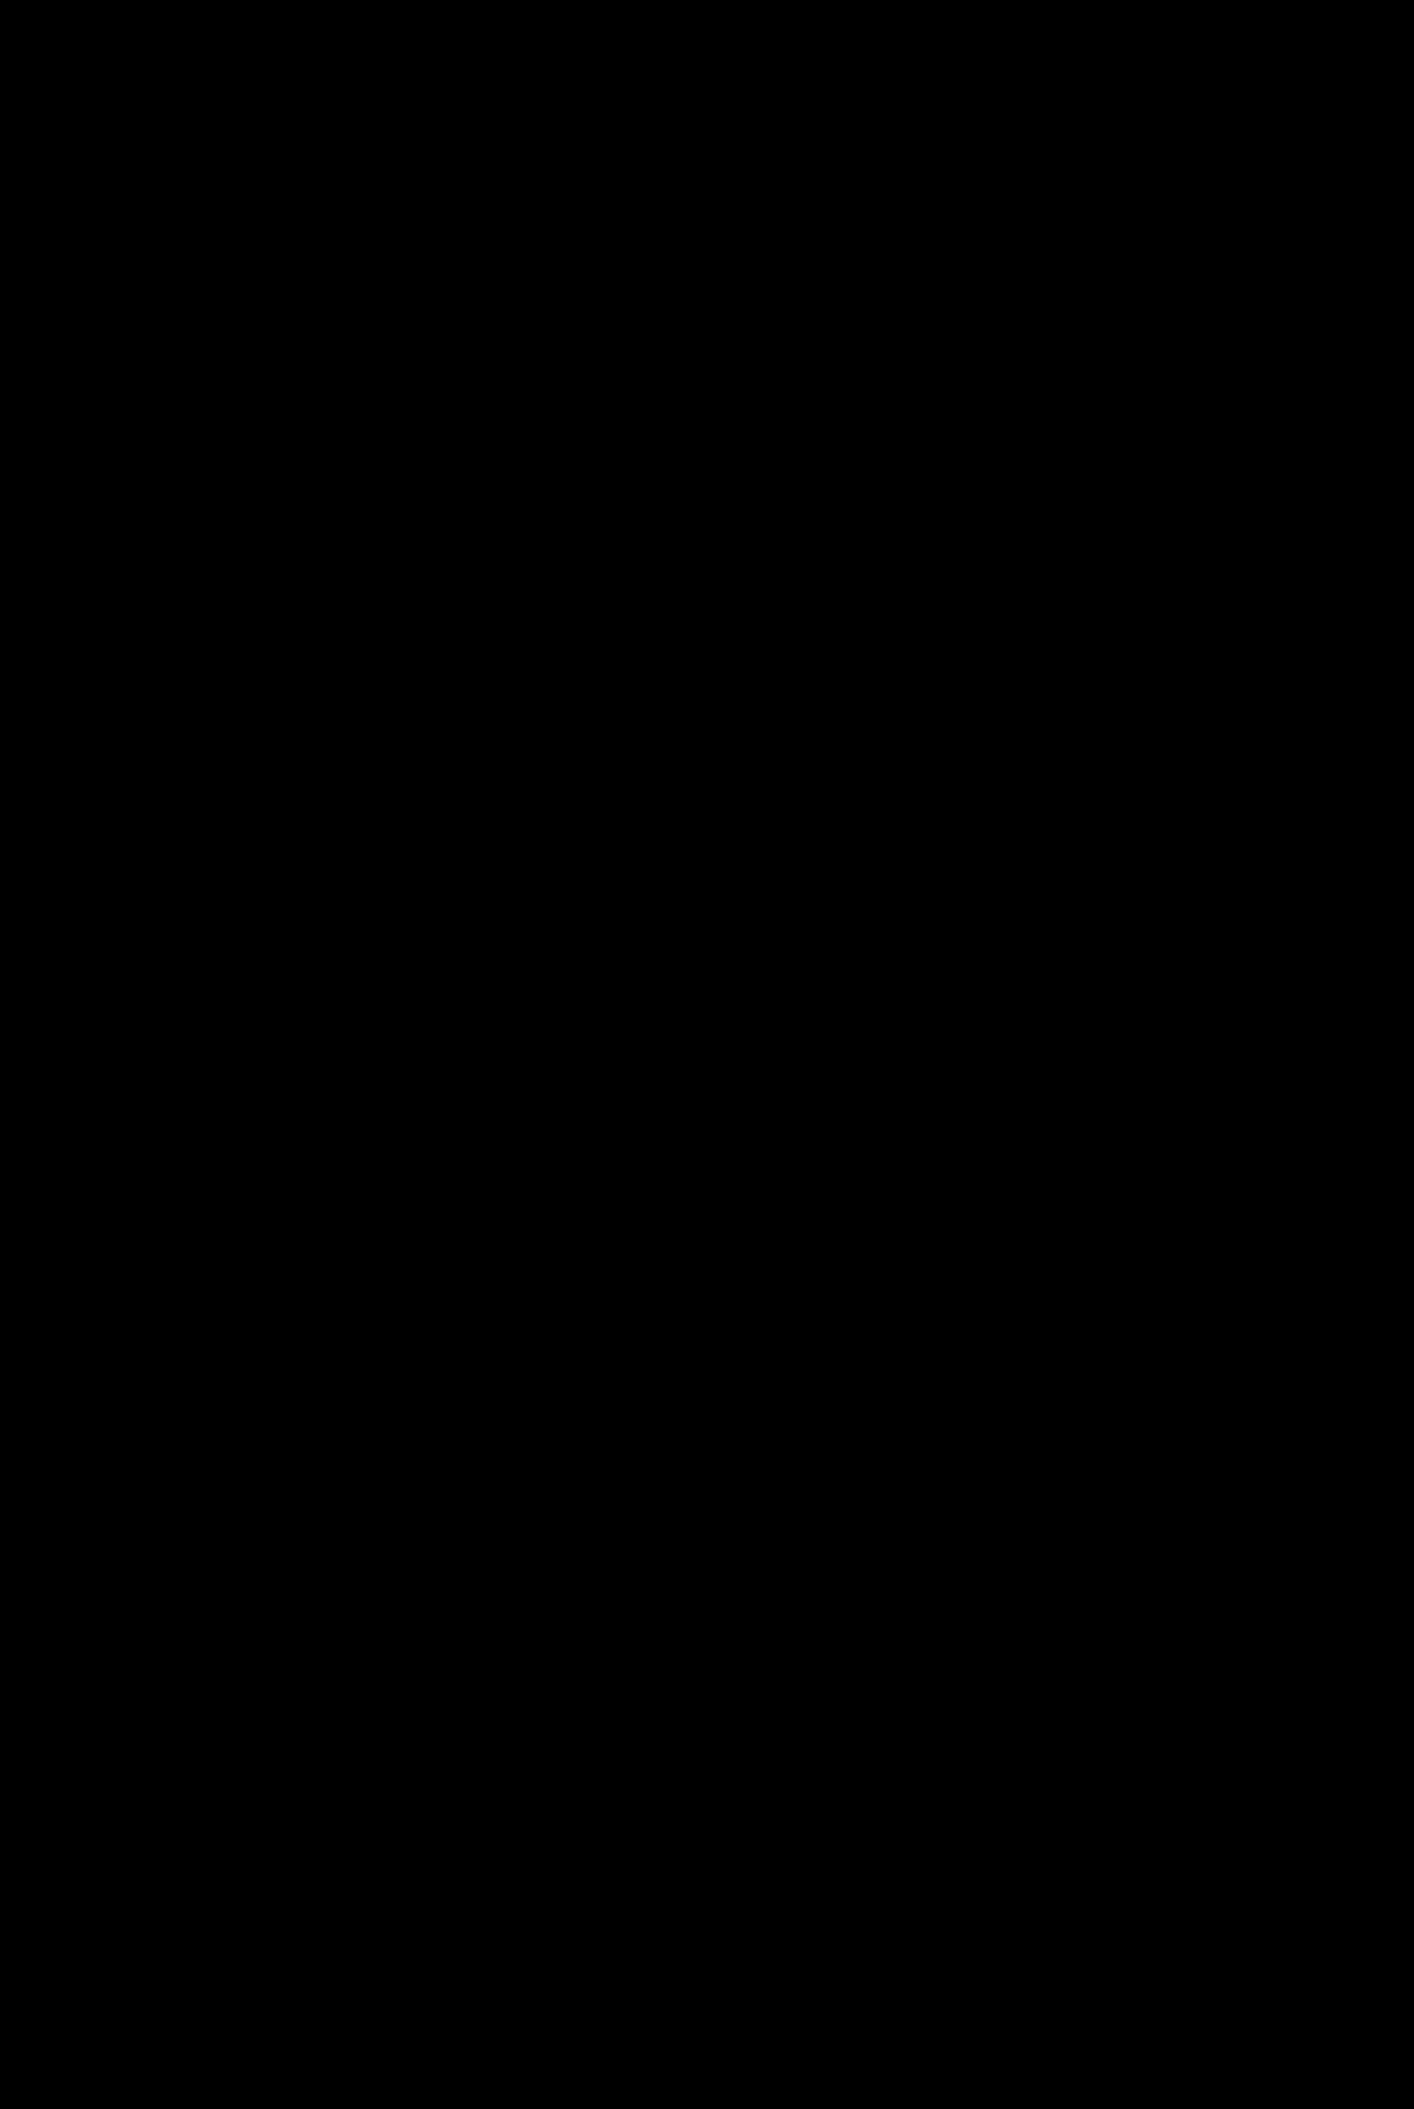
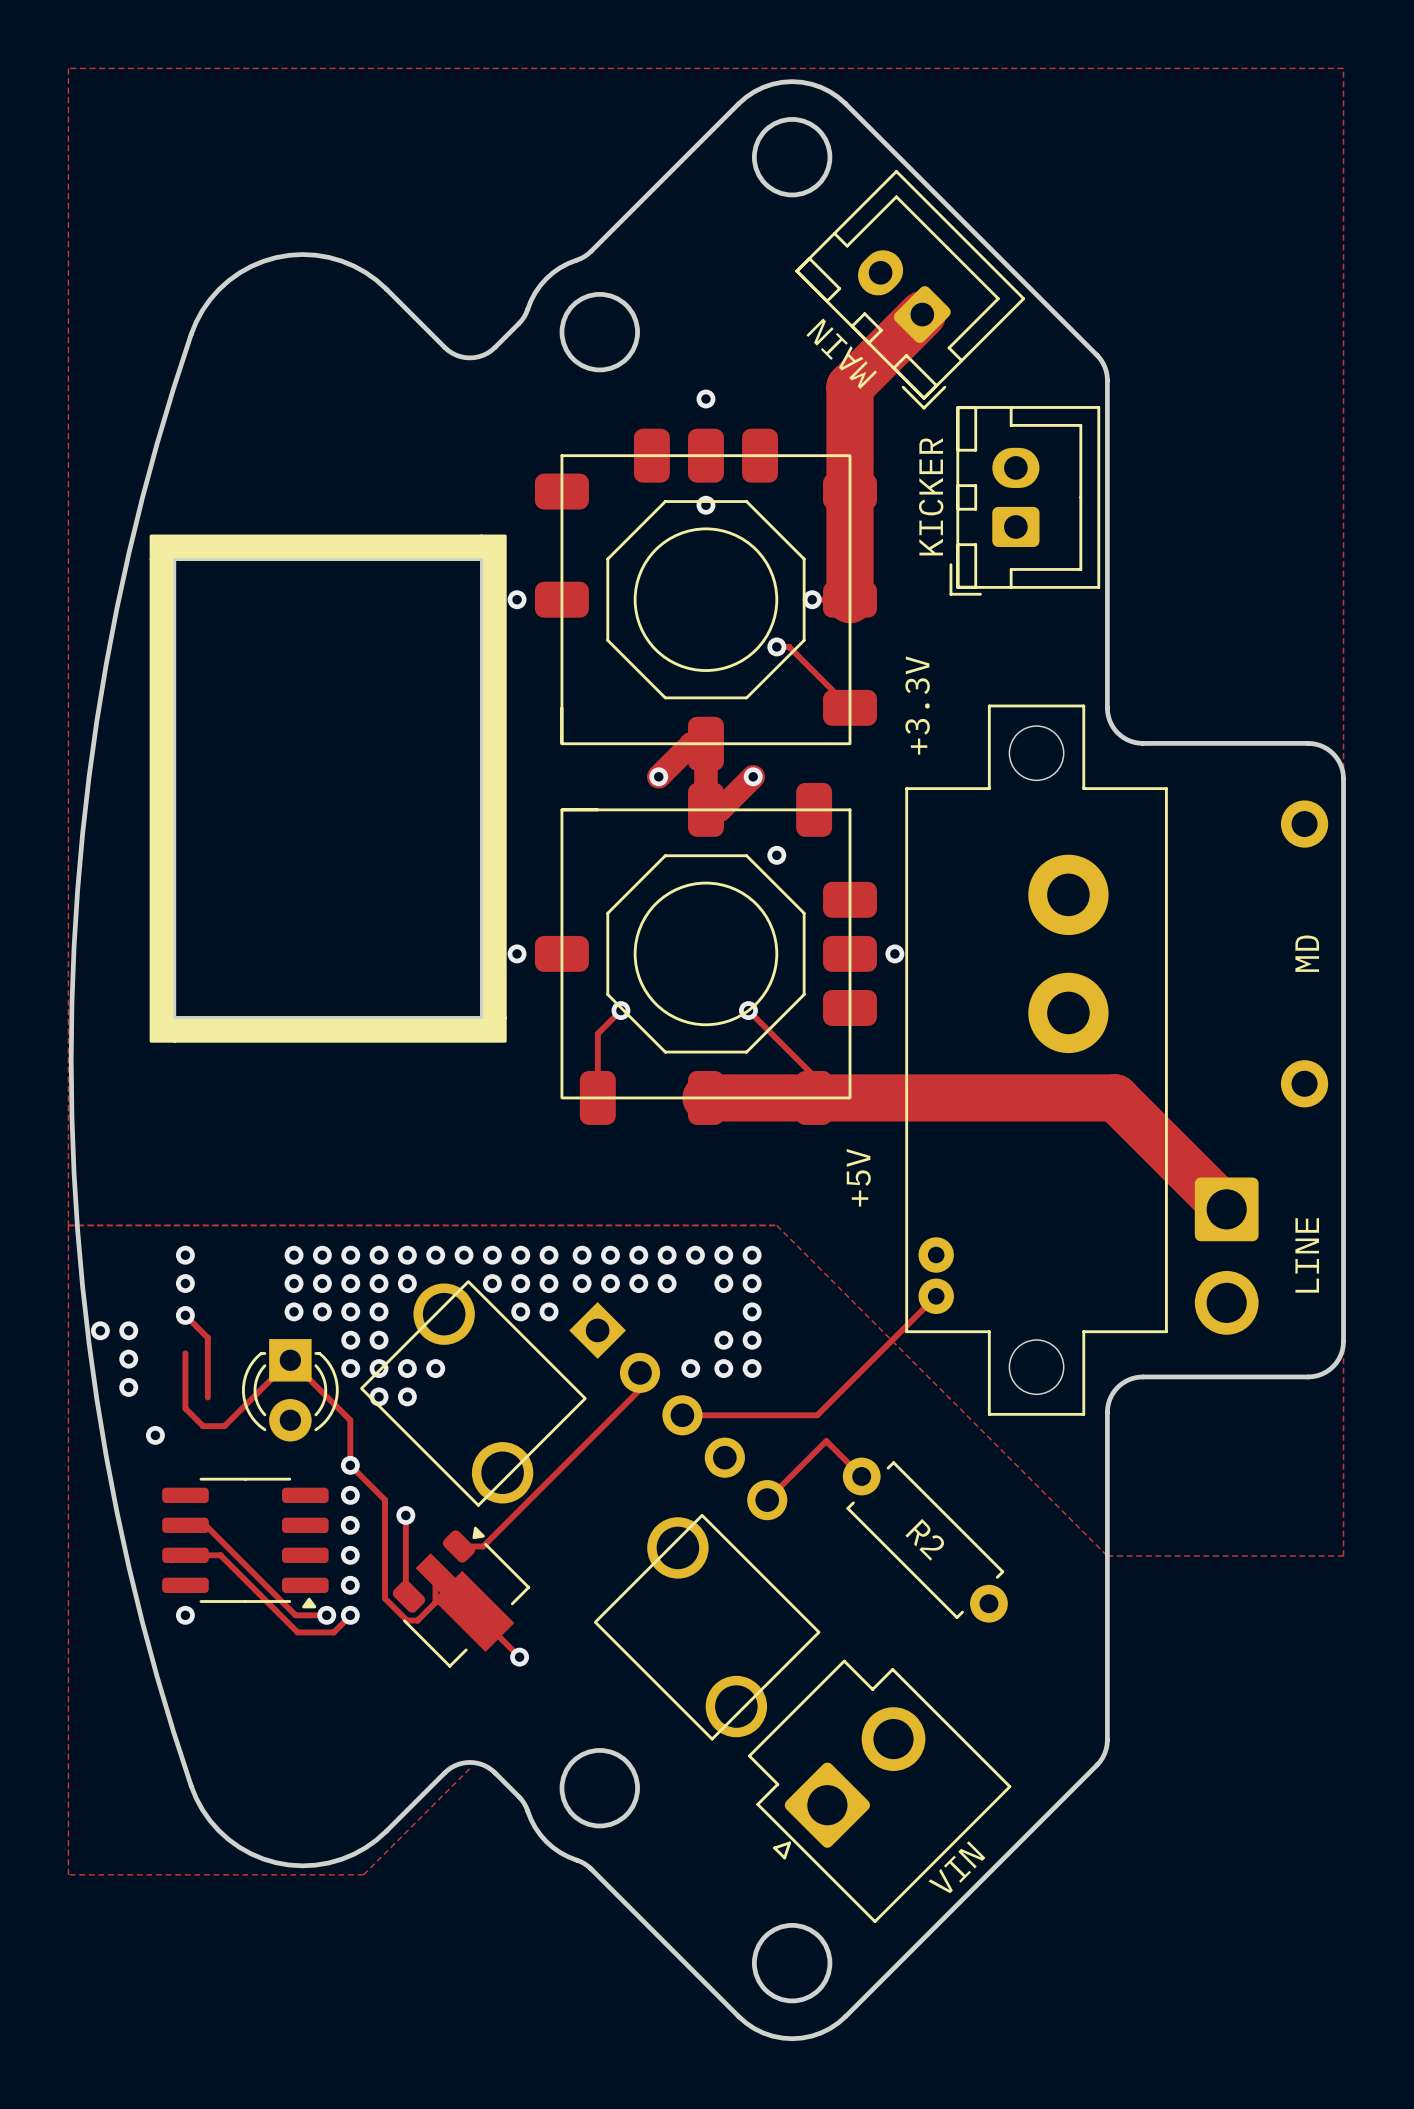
board edge: none -> (738, 103) (590, 251) (580, 258) (560, 267) (546, 278) (535, 292) (521, 320) (494, 347) (483, 355) (465, 357) (452, 353) (376, 280) (341, 261) (315, 255) (289, 255) (251, 266) (228, 280) (202, 310) (191, 334) (173, 388) (142, 497) (116, 608) (96, 720) (77, 889) (71, 1003) (71, 1116) (82, 1287) (96, 1399) (116, 1511) (142, 1622) (173, 1731) (196, 1798) (210, 1820) (228, 1839) (263, 1859) (289, 1865) (328, 1862) (353, 1854) (376, 1840) (451, 1767) (466, 1762) (481, 1764) (492, 1770) (521, 1800) (535, 1827) (546, 1841) (560, 1852) (580, 1861) (590, 1868) (738, 2016) (763, 2033) (792, 2038) (821, 2032) (845, 2016) (1102, 1757) (1107, 1740) (1107, 1412) (1109, 1400) (1115, 1390) (1123, 1382) (1138, 1377) (1313, 1376) (1329, 1369) (1340, 1355) (1343, 1341) (1343, 778) (1341, 767) (1335, 756) (1326, 748) (1315, 744) (1138, 743) (1127, 739) (1117, 732) (1110, 723) (1107, 707) (1107, 380) (1105, 369) (1101, 360) (838, 97) (811, 84) (792, 81) (763, 87) (738, 103)
round board edge: none -> [752, 117, 833, 198]
MAIN: none -> (910, 289)
round board edge: none -> [559, 292, 640, 373]
track: none -> (922, 314) (850, 386) (850, 599) (812, 599)
via: none -> (705, 398)
KICKER: none -> (1024, 500)
via: none -> (705, 505)
drawing: none -> [149, 534, 507, 1043]
via: none -> (517, 599)
+3.3V: none -> (705, 599)
via: none -> (812, 599)
track: none -> (776, 646) (789, 646) (850, 707)
via: none -> (776, 646)
track: none -> (658, 776) (691, 743) (705, 743) (705, 809) (720, 809) (753, 776)
via: none -> (658, 776)
via: none -> (753, 776)
via: none -> (776, 855)
via: none -> (517, 953)
+5V: none -> (705, 953)
via: none -> (894, 953)
MD: none -> (1178, 953)
track: none -> (620, 1010) (597, 1033) (597, 1097)
via: none -> (620, 1010)
track: none -> (748, 1010) (814, 1076) (814, 1097)
via: none -> (748, 1010)
part: none -> (1036, 1060)
track: none -> (705, 1097) (1115, 1097) (1226, 1209)
zone outline: none -> (68, 1225) (776, 1225) (1107, 1556) (1343, 1556) (1343, 68) (68, 68) (68, 1874) (363, 1874) (469, 1768)
via: none -> (185, 1255)
via: none -> (294, 1255)
via: none -> (322, 1255)
via: none -> (350, 1255)
via: none -> (379, 1255)
via: none -> (407, 1255)
via: none -> (435, 1255)
via: none -> (464, 1255)
via: none -> (492, 1255)
via: none -> (520, 1255)
via: none -> (549, 1255)
via: none -> (582, 1255)
via: none -> (610, 1255)
via: none -> (638, 1255)
via: none -> (667, 1255)
via: none -> (695, 1255)
via: none -> (723, 1255)
via: none -> (752, 1255)
LINE: none -> (1226, 1256)
via: none -> (185, 1283)
via: none -> (294, 1283)
via: none -> (322, 1283)
via: none -> (350, 1283)
via: none -> (379, 1283)
via: none -> (407, 1283)
via: none -> (492, 1283)
via: none -> (520, 1283)
via: none -> (549, 1283)
via: none -> (582, 1283)
via: none -> (610, 1283)
via: none -> (638, 1283)
via: none -> (667, 1283)
via: none -> (723, 1283)
via: none -> (752, 1283)
track: none -> (936, 1296) (817, 1415) (682, 1415)
via: none -> (294, 1311)
via: none -> (322, 1311)
via: none -> (350, 1311)
via: none -> (379, 1311)
via: none -> (520, 1311)
via: none -> (549, 1311)
via: none -> (752, 1311)
track: none -> (185, 1315) (207, 1337) (207, 1397)
via: none -> (185, 1315)
via: none -> (100, 1330)
via: none -> (128, 1330)
via: none -> (350, 1340)
via: none -> (379, 1340)
via: none -> (723, 1340)
via: none -> (752, 1340)
track: none -> (185, 1353) (185, 1408) (203, 1426) (224, 1426) (290, 1360) (350, 1420) (350, 1465) (385, 1500) (385, 1598) (407, 1620) (417, 1620) (435, 1602) (435, 1573) (519, 1657)
via: none -> (128, 1359)
via: none -> (350, 1368)
via: none -> (379, 1368)
via: none -> (407, 1368)
via: none -> (435, 1368)
via: none -> (690, 1368)
via: none -> (723, 1368)
via: none -> (752, 1368)
track: none -> (640, 1372) (640, 1389) (483, 1546) (459, 1546)
via: none -> (128, 1387)
part: none -> (290, 1390)
via: none -> (379, 1396)
via: none -> (407, 1396)
part: none -> (678, 1411)
via: none -> (155, 1435)
via: none -> (350, 1465)
track: none -> (861, 1476) (826, 1441) (767, 1500)
via: none -> (350, 1495)
part: none -> (590, 1510)
track: none -> (405, 1515) (405, 1593) (408, 1596)
via: none -> (405, 1515)
track: none -> (185, 1525) (205, 1525) (295, 1615) (326, 1615)
via: none -> (350, 1525)
R2: none -> (925, 1540)
part: none -> (245, 1543)
track: none -> (185, 1555) (220, 1555) (297, 1632) (333, 1632) (350, 1615)
via: none -> (350, 1555)
via: none -> (350, 1585)
part: none -> (461, 1597)
via: none -> (185, 1615)
via: none -> (326, 1615)
via: none -> (350, 1615)
via: none -> (519, 1657)
round board edge: none -> [559, 1748, 640, 1829]
VIN: none -> (879, 1791)
round board edge: none -> [752, 1923, 833, 2004]

